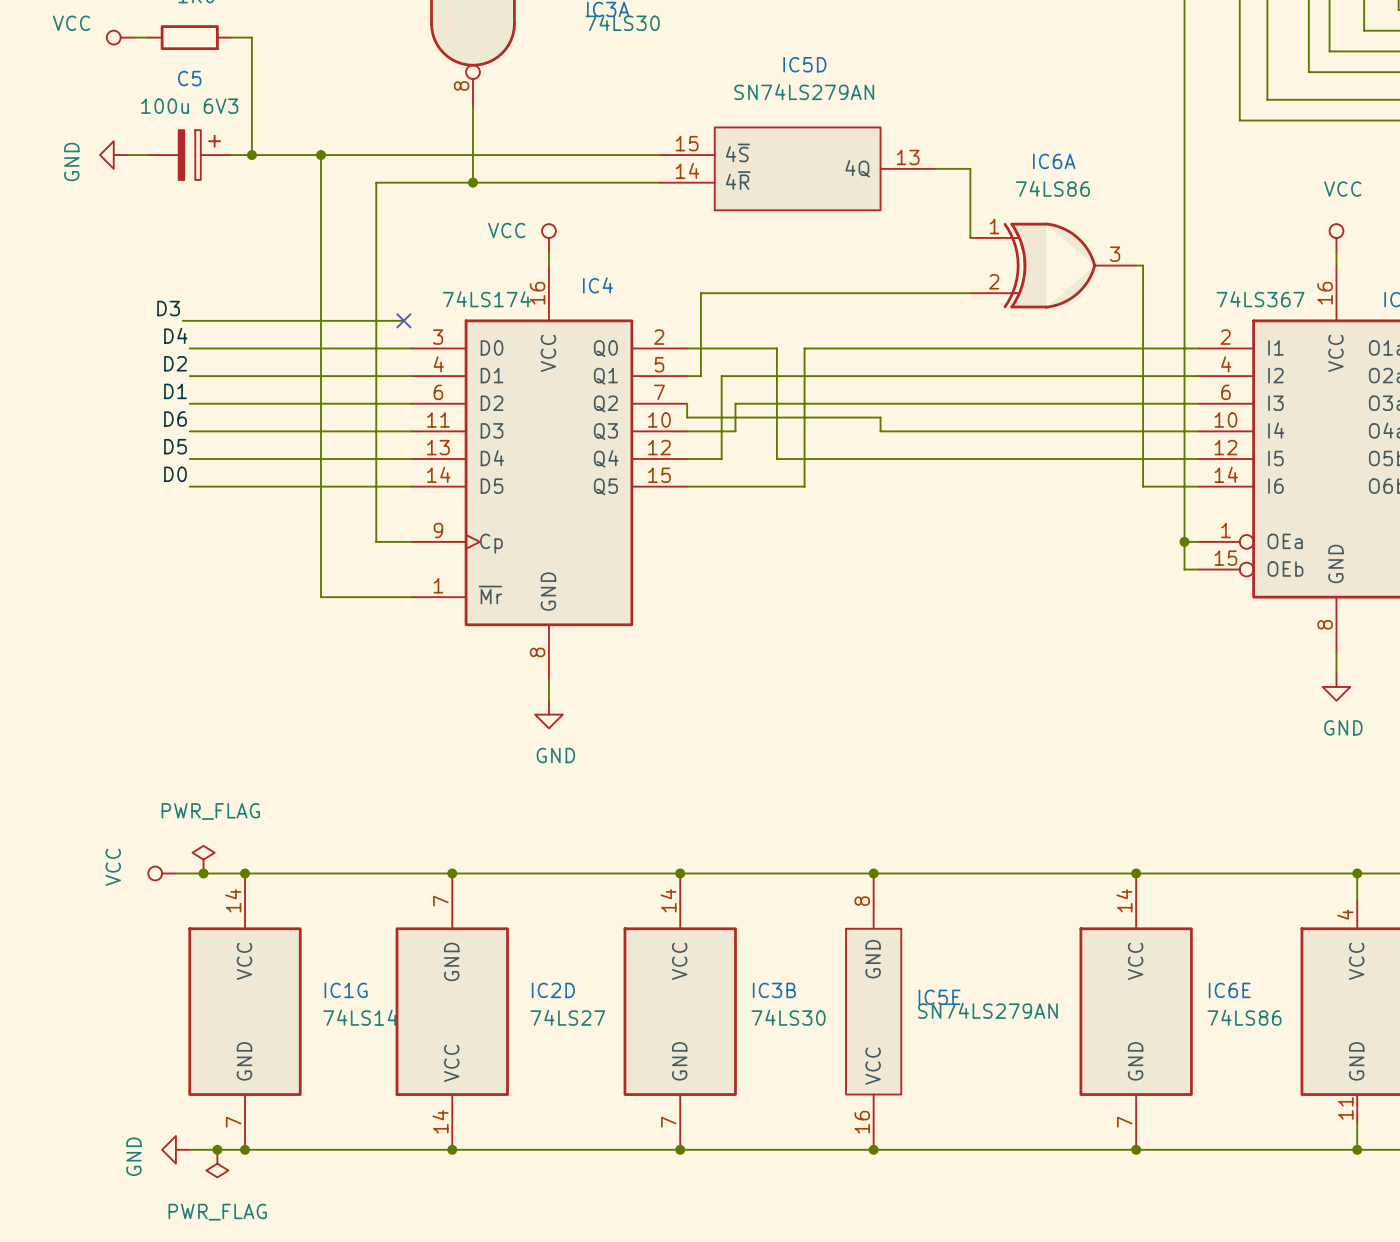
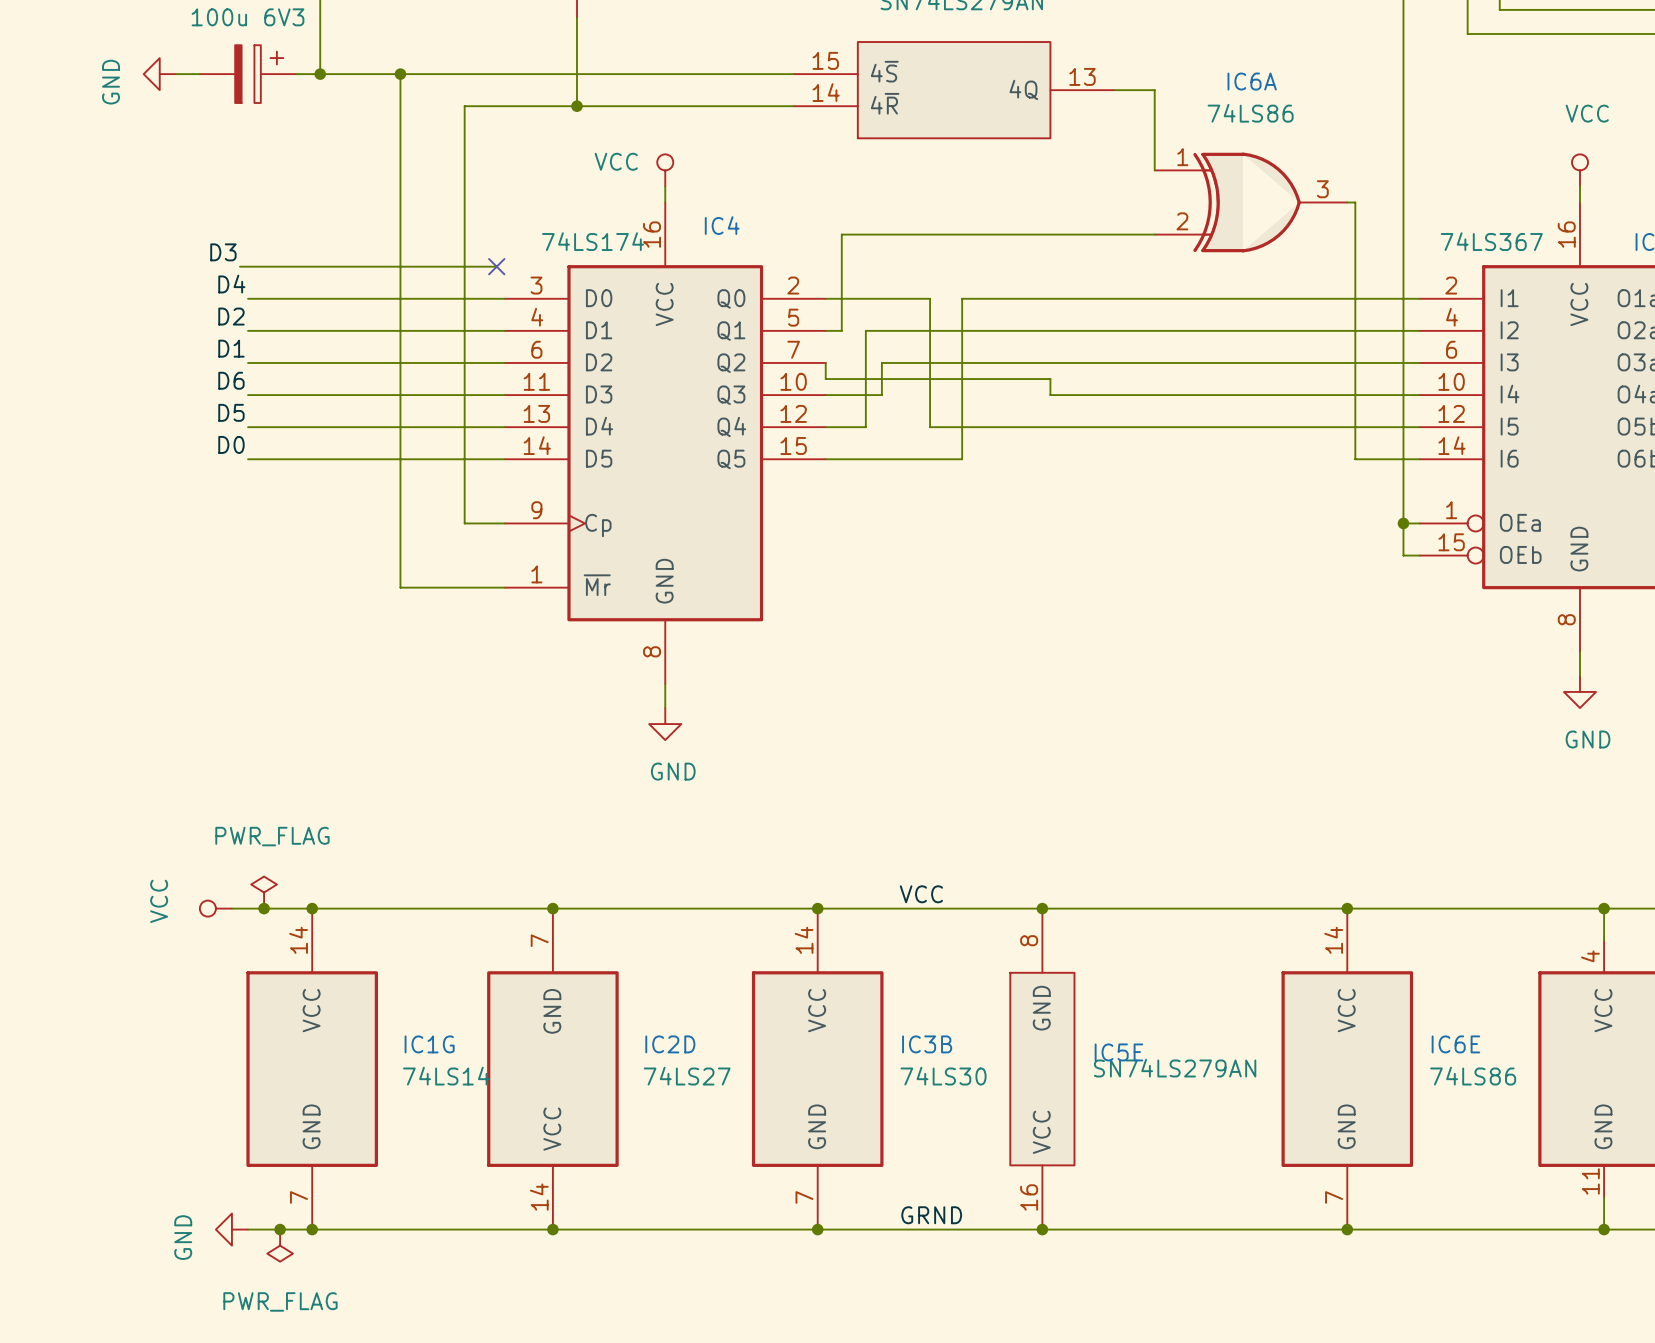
label: none -> VCC (921, 894)
label: none -> GRND (931, 1215)

